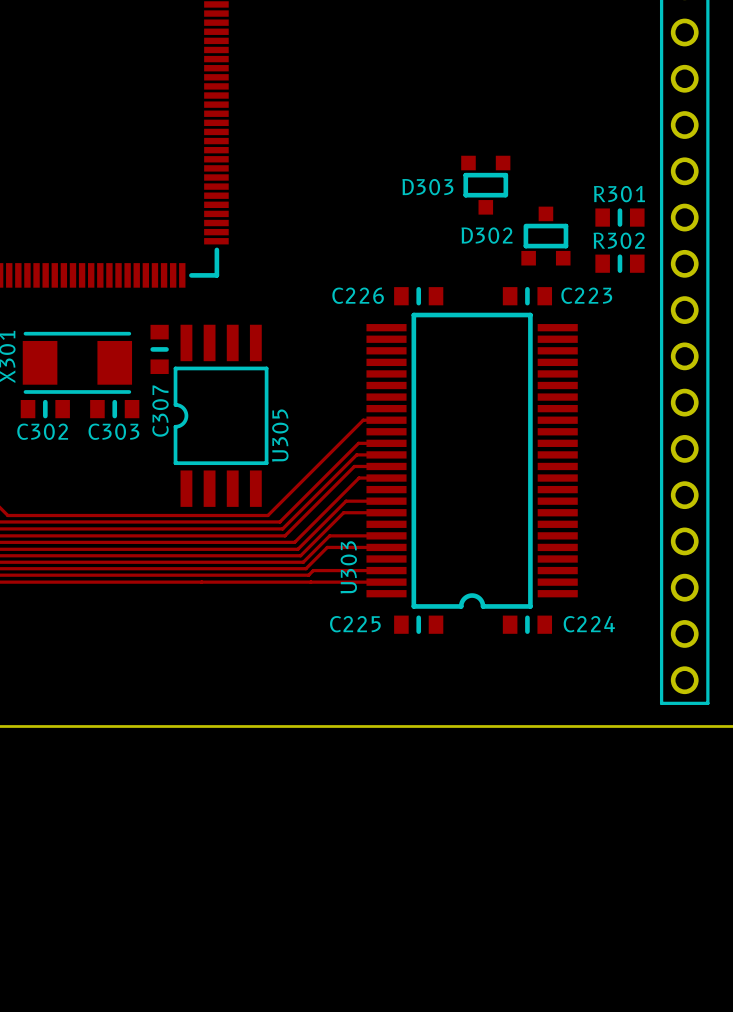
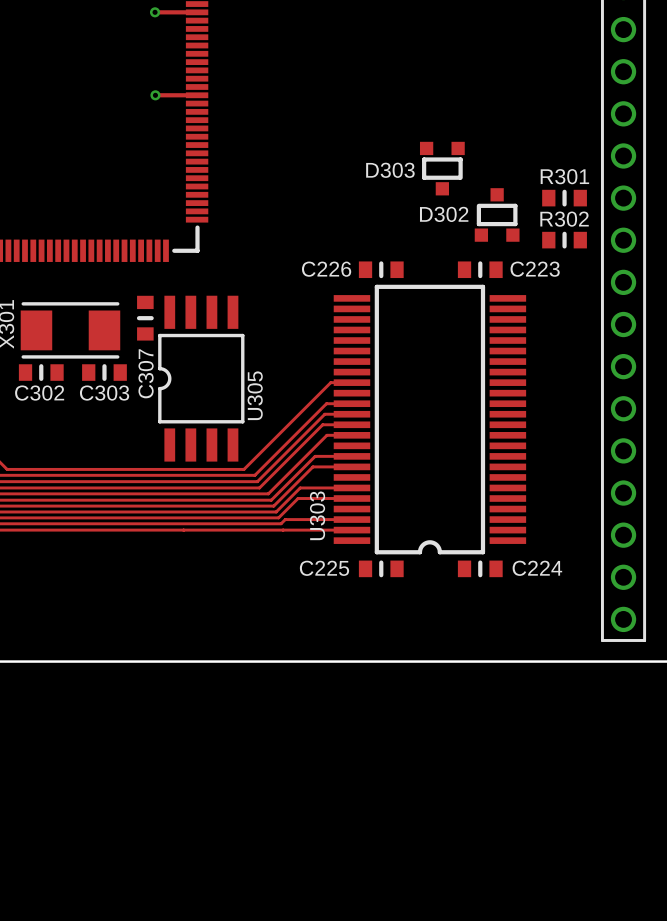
track: none -> (155, 12) (197, 12)
via: none -> (155, 12)
track: none -> (155, 95) (197, 95)
via: none -> (155, 95)

